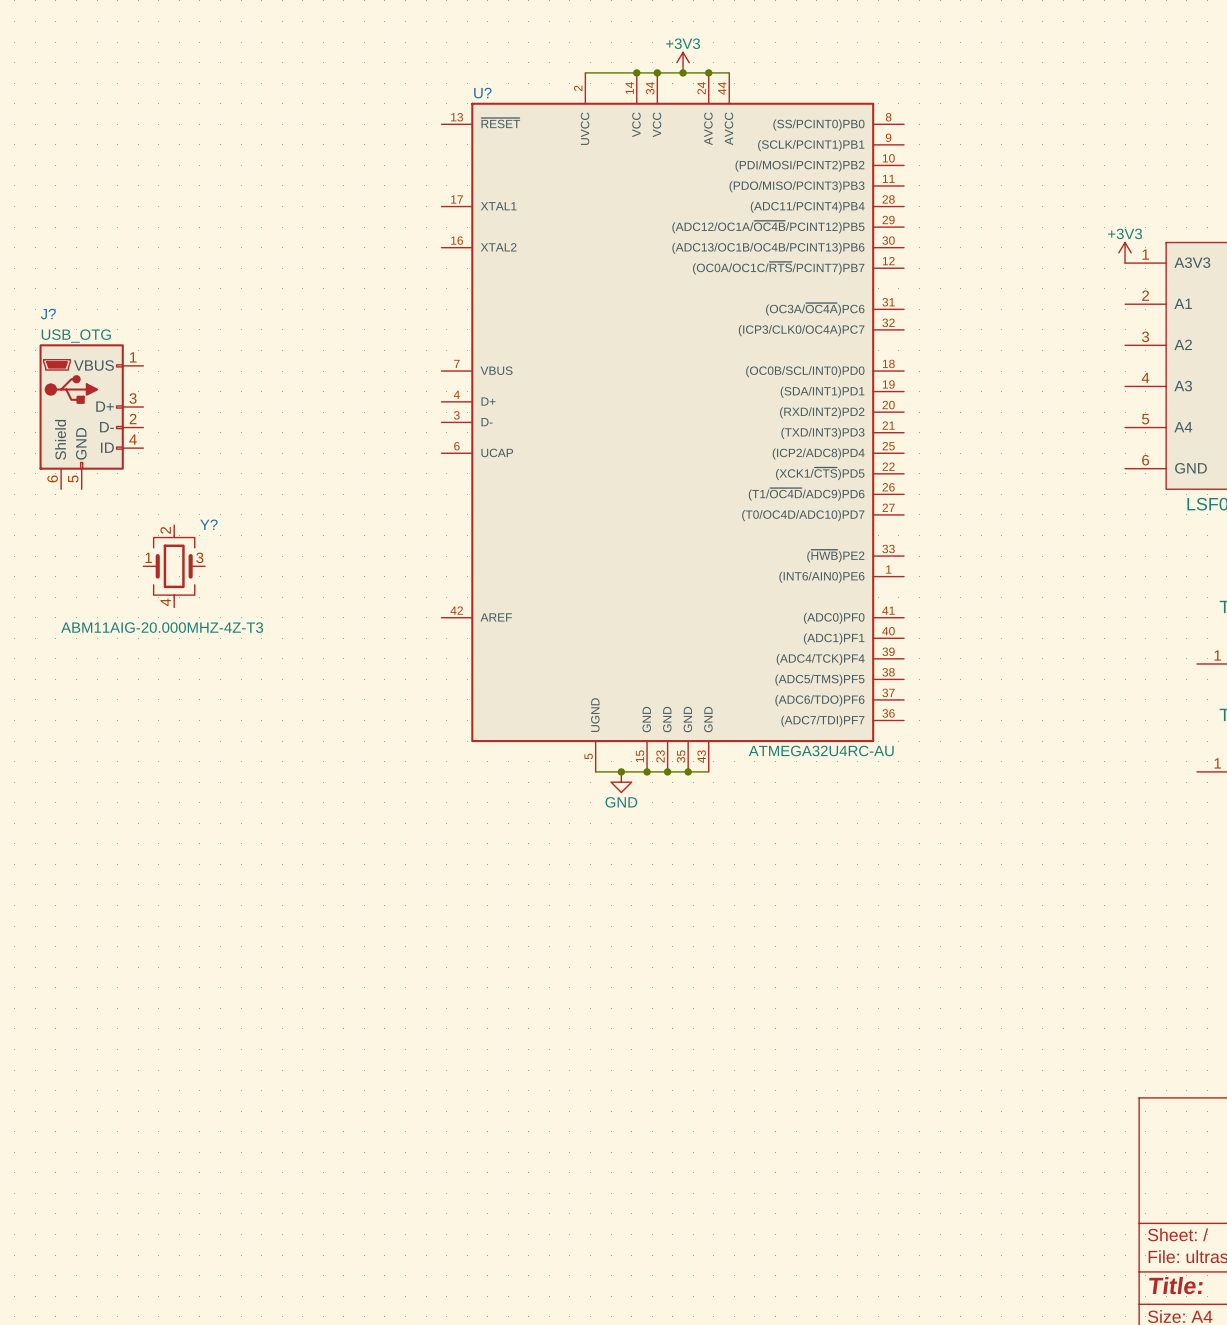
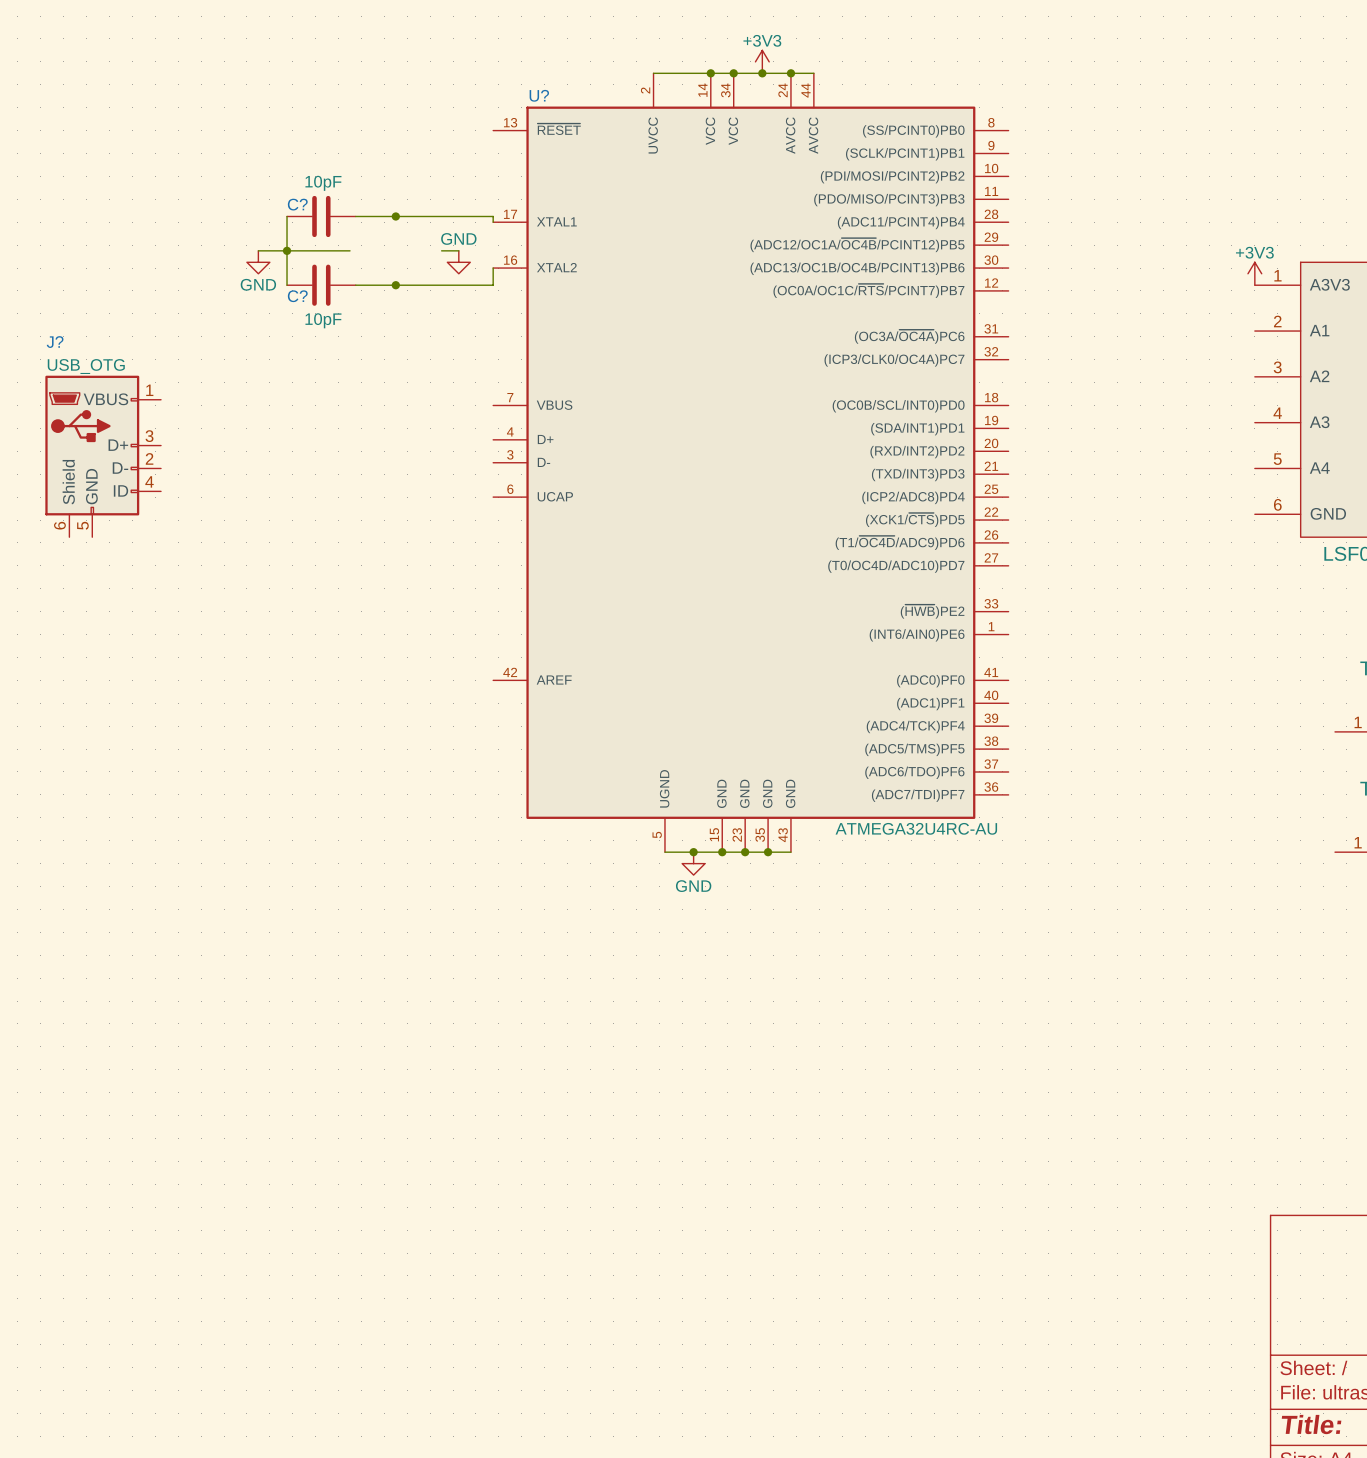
wire: none -> (287, 216) (287, 285)
C?: none -> 10pF (321, 216)
wire: none -> (355, 216) (493, 216) (493, 222)
junction: none -> (395, 216)
wire: none -> (258, 250) (350, 250)
junction: none -> (287, 250)
wire: none -> (441, 250) (458, 250)
power symbol: none -> GND (258, 262)
power symbol: none -> GND (458, 262)
wire: none -> (493, 268) (493, 285) (355, 285)
C?: none -> 10pF (321, 285)
junction: none -> (395, 285)
Y?: ABM11AIG-20.000MHZ-4Z-T3 (174, 566) -> none

